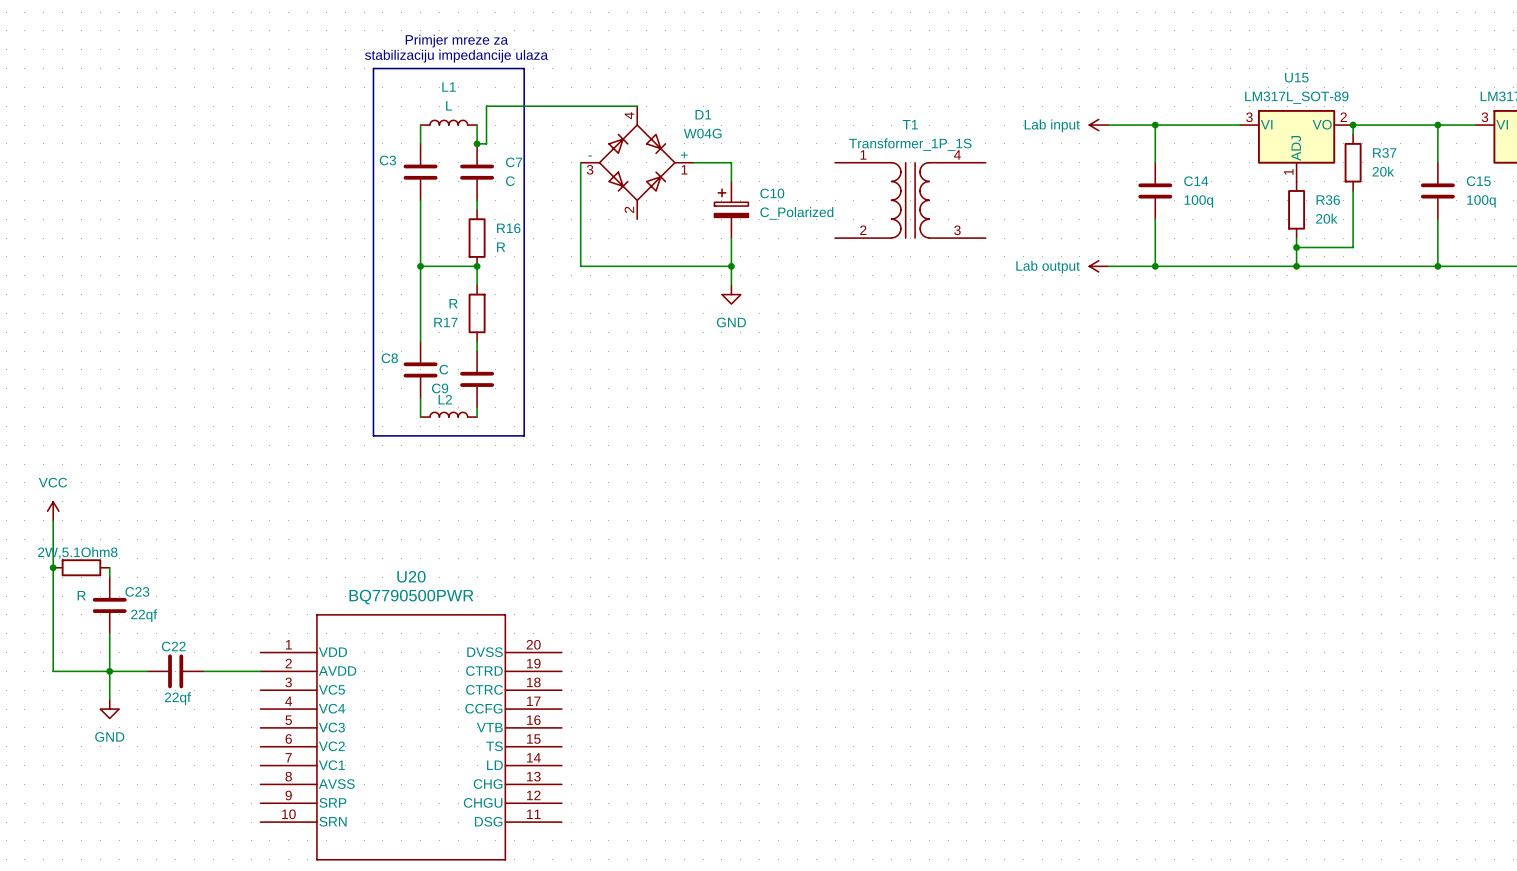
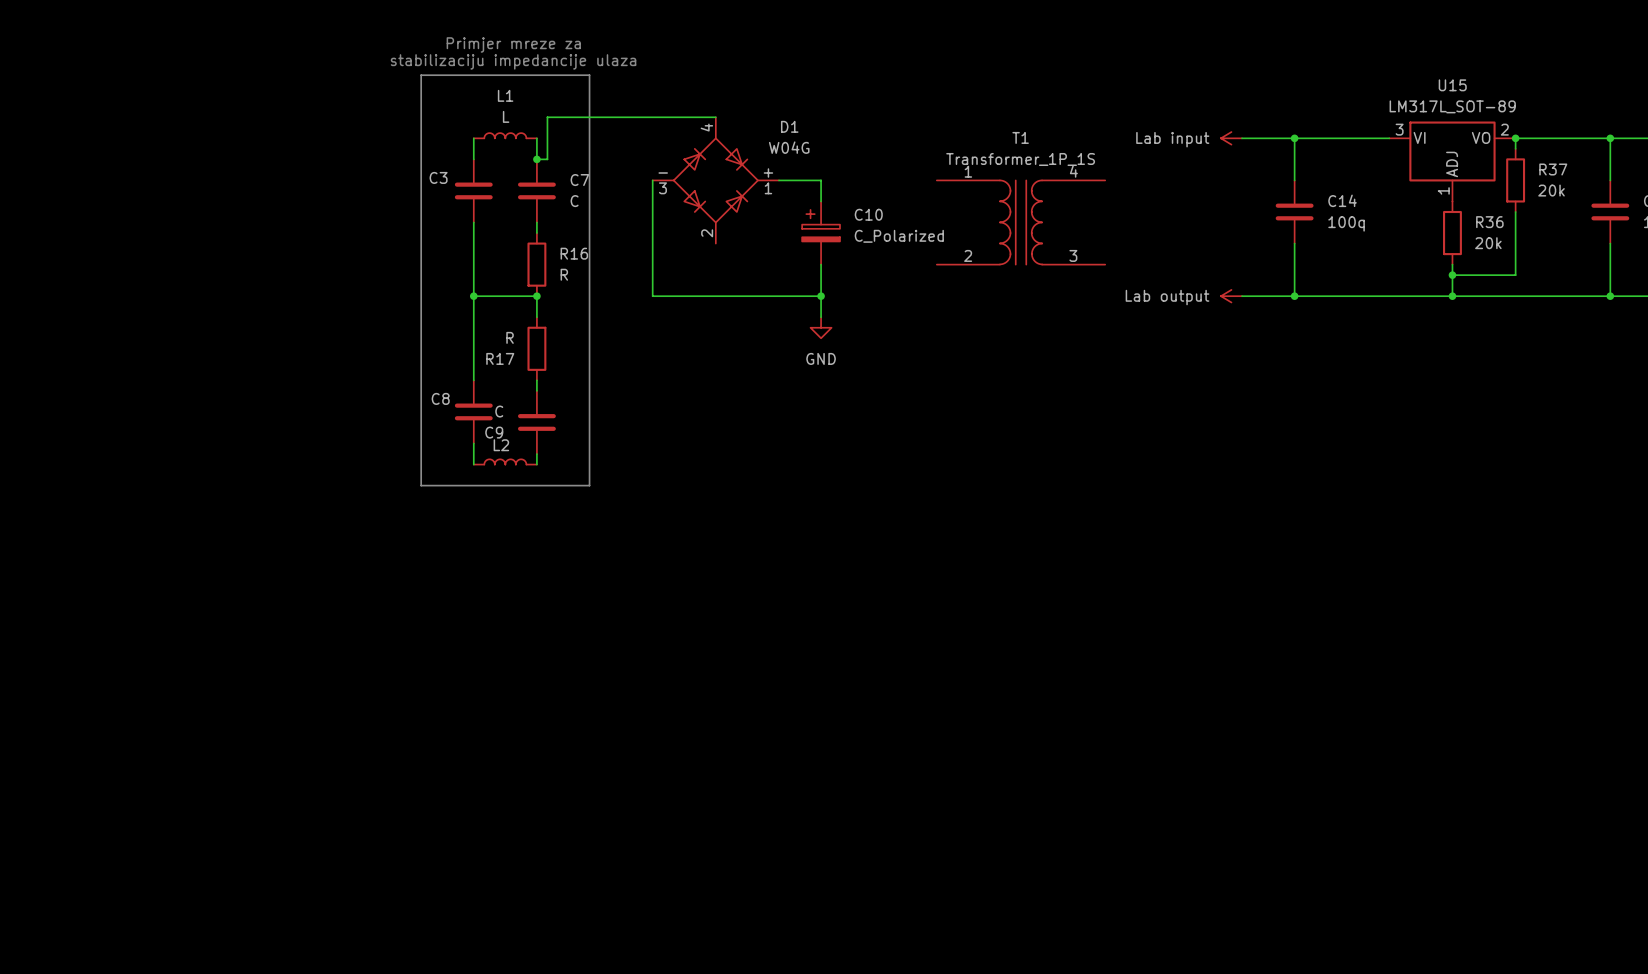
power symbol: VCC (53, 511) -> none
wire: (53, 520) (53, 671) (147, 671) -> none
junction: (53, 567) -> none
2W,5.1Ohm8: R (81, 567) -> none
wire: (109, 567) (109, 577) -> none
C23: 22qf (109, 605) -> none
wire: (109, 633) (109, 699) -> none
junction: (109, 671) -> none
C22: 22qf (175, 671) -> none
wire: (203, 671) (260, 671) -> none
power symbol: GND (109, 709) -> none
U20: BQ7790500PWR (411, 737) -> none

